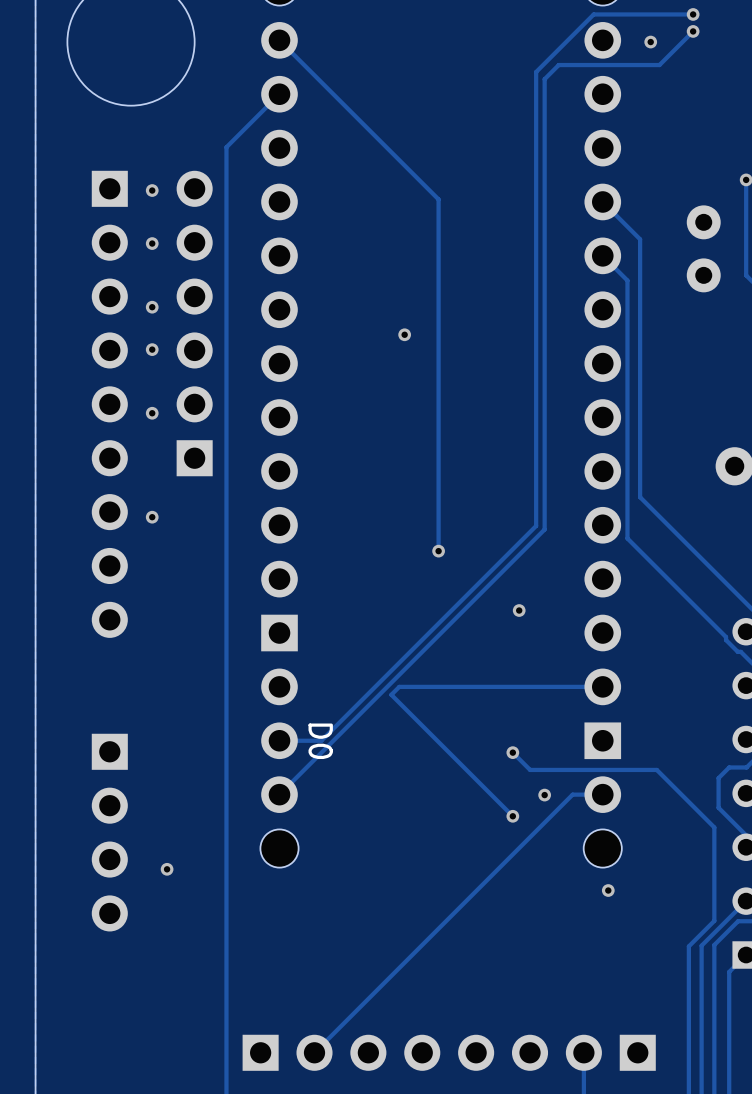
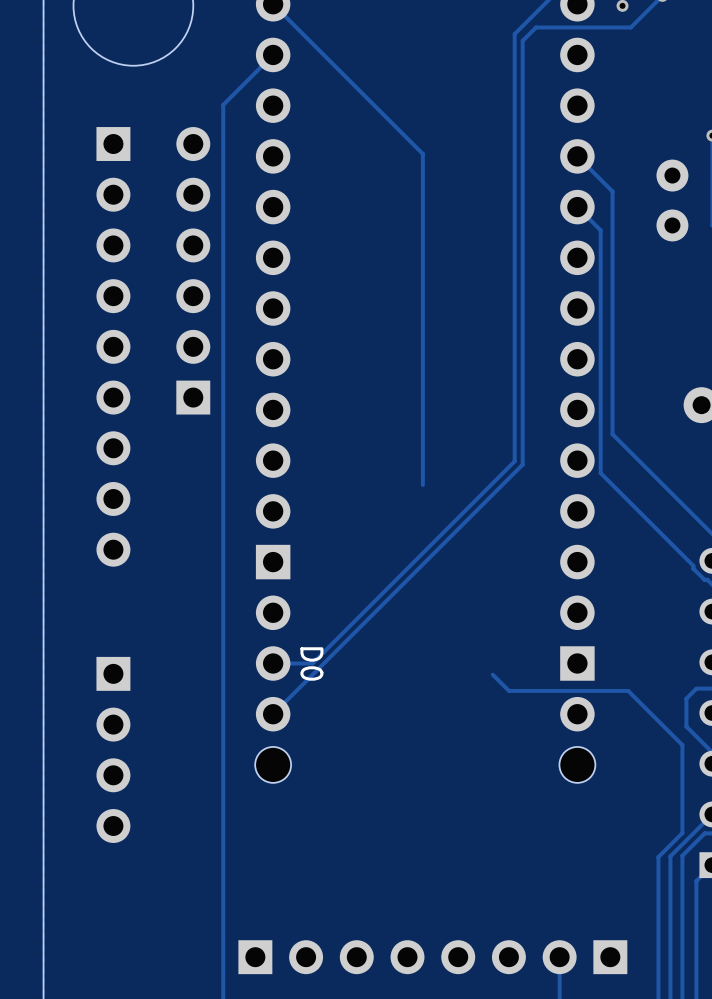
via: (152, 190) -> none
via: (152, 243) -> none
via: (152, 307) -> none
via: (404, 334) -> none
via: (152, 349) -> none
via: (152, 413) -> none
via: (152, 517) -> none
via: (438, 551) -> none
via: (519, 610) -> none
track: (602, 686) (399, 686) (391, 694) (512, 816) -> none
via: (512, 752) -> none
track: (602, 794) (572, 794) (314, 1052) -> none
via: (544, 795) -> none
via: (512, 816) -> none
via: (167, 869) -> none
via: (608, 890) -> none

